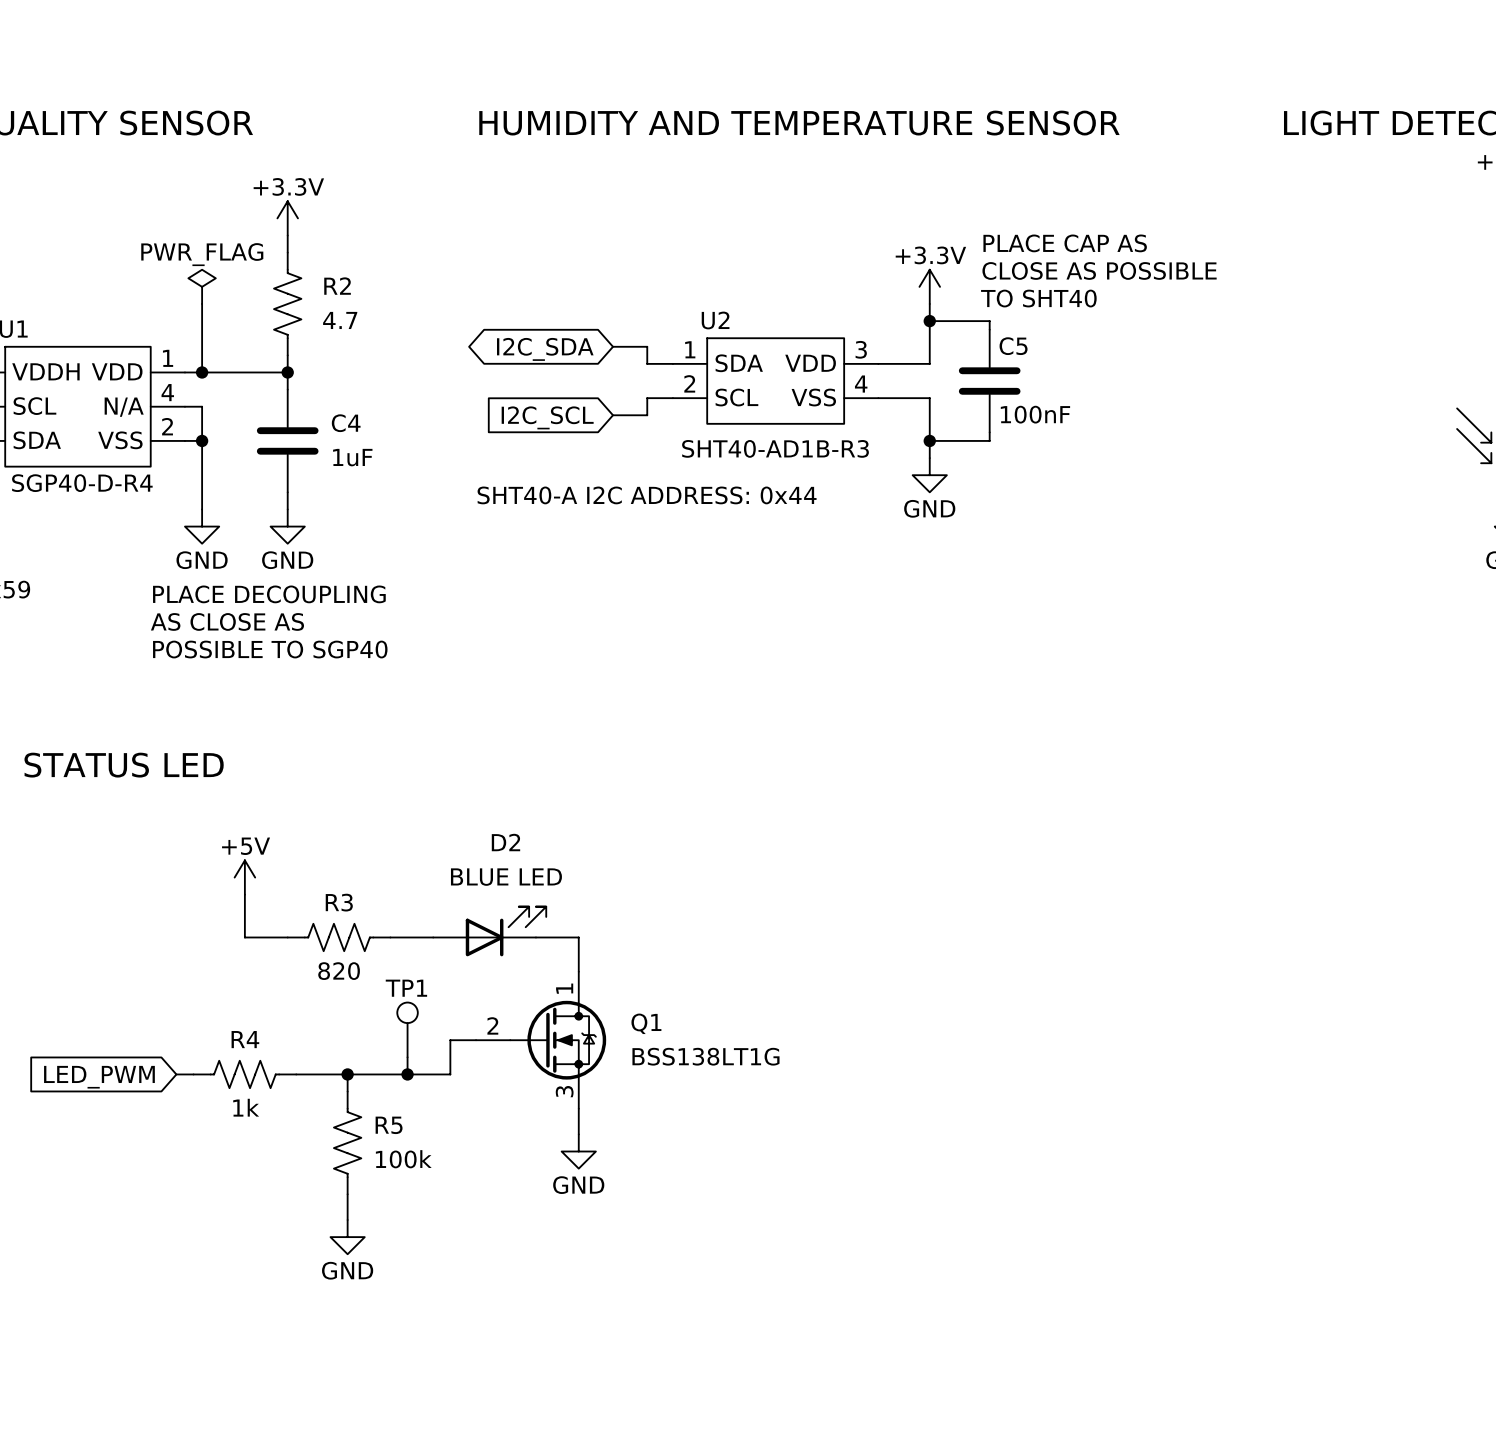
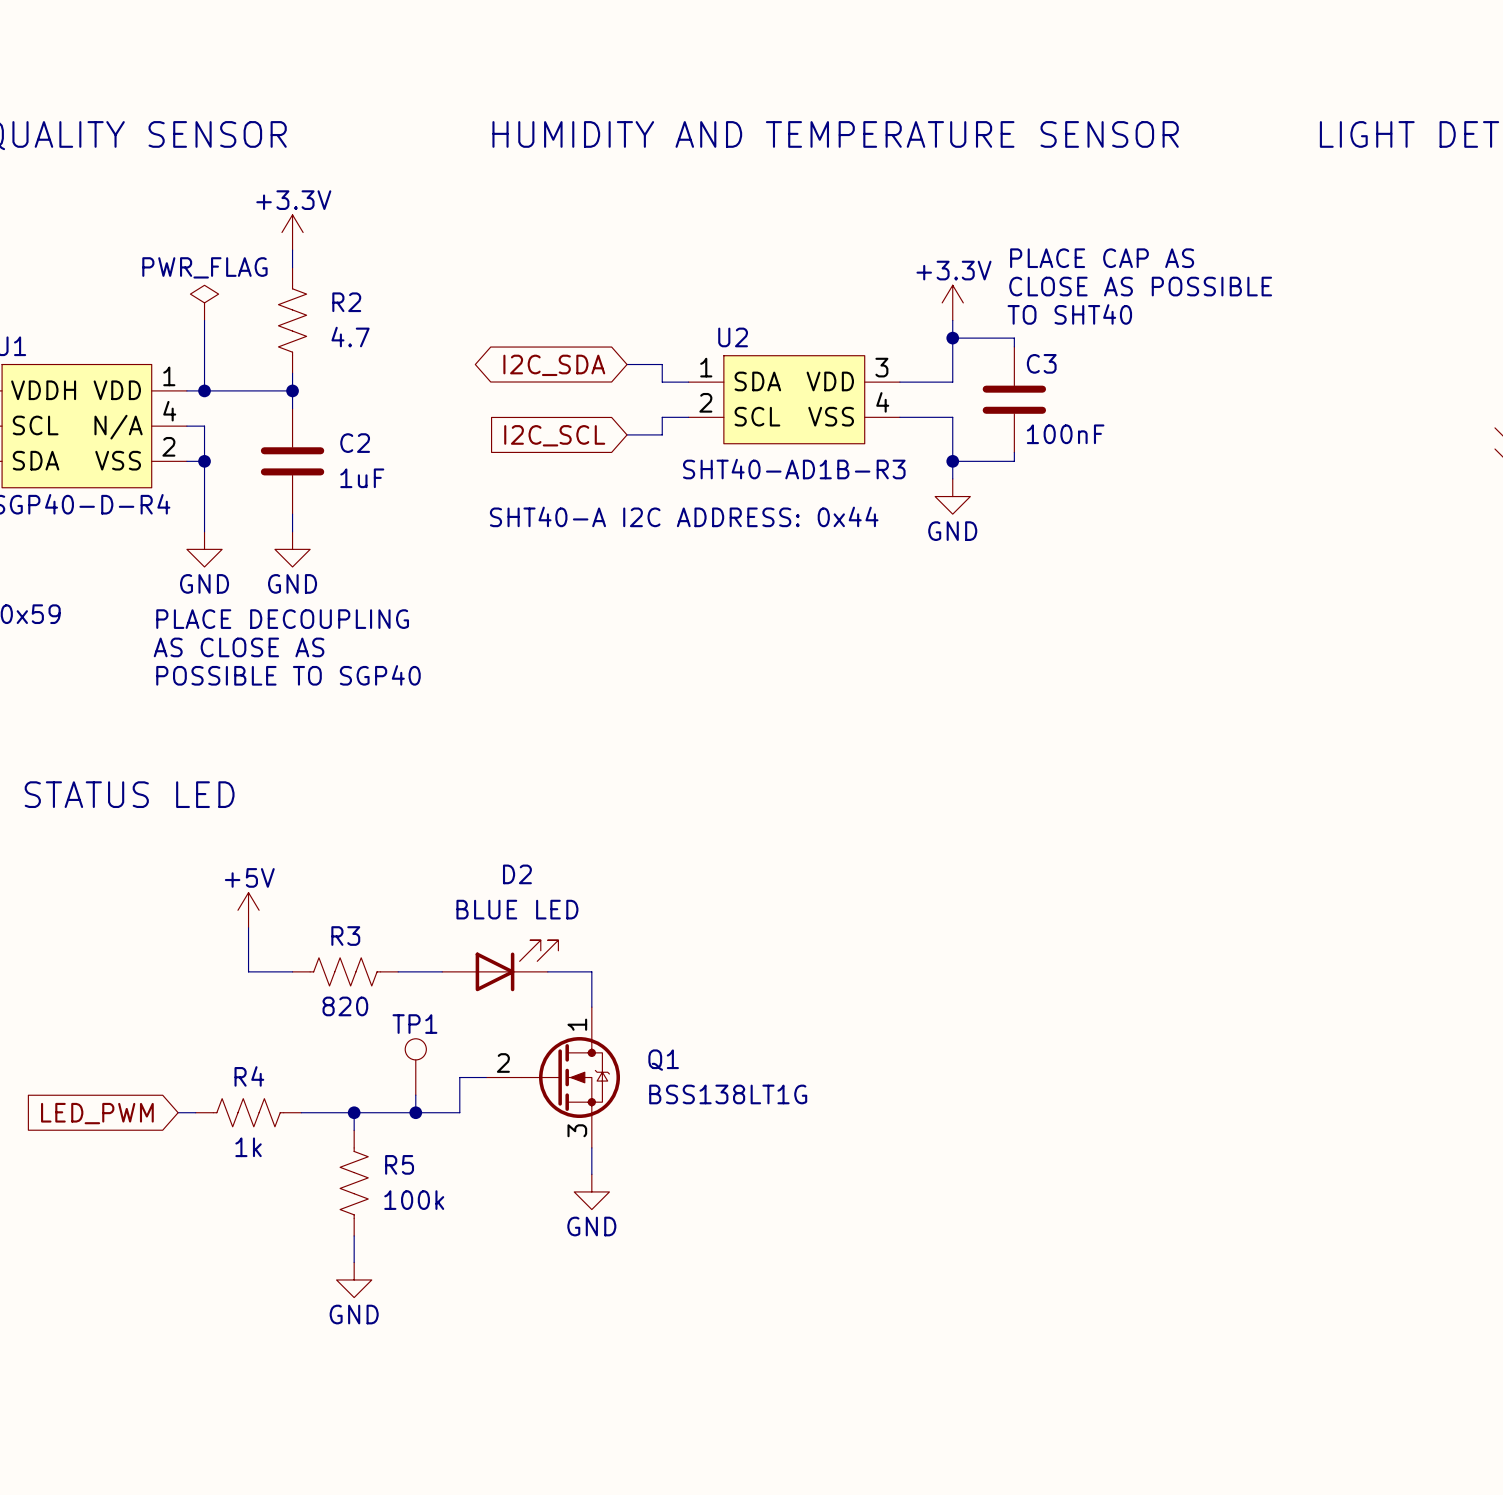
C5 name: C5 (1013, 346) -> C3 (1041, 363)
C4 name: C4 (346, 423) -> C2 (355, 443)

